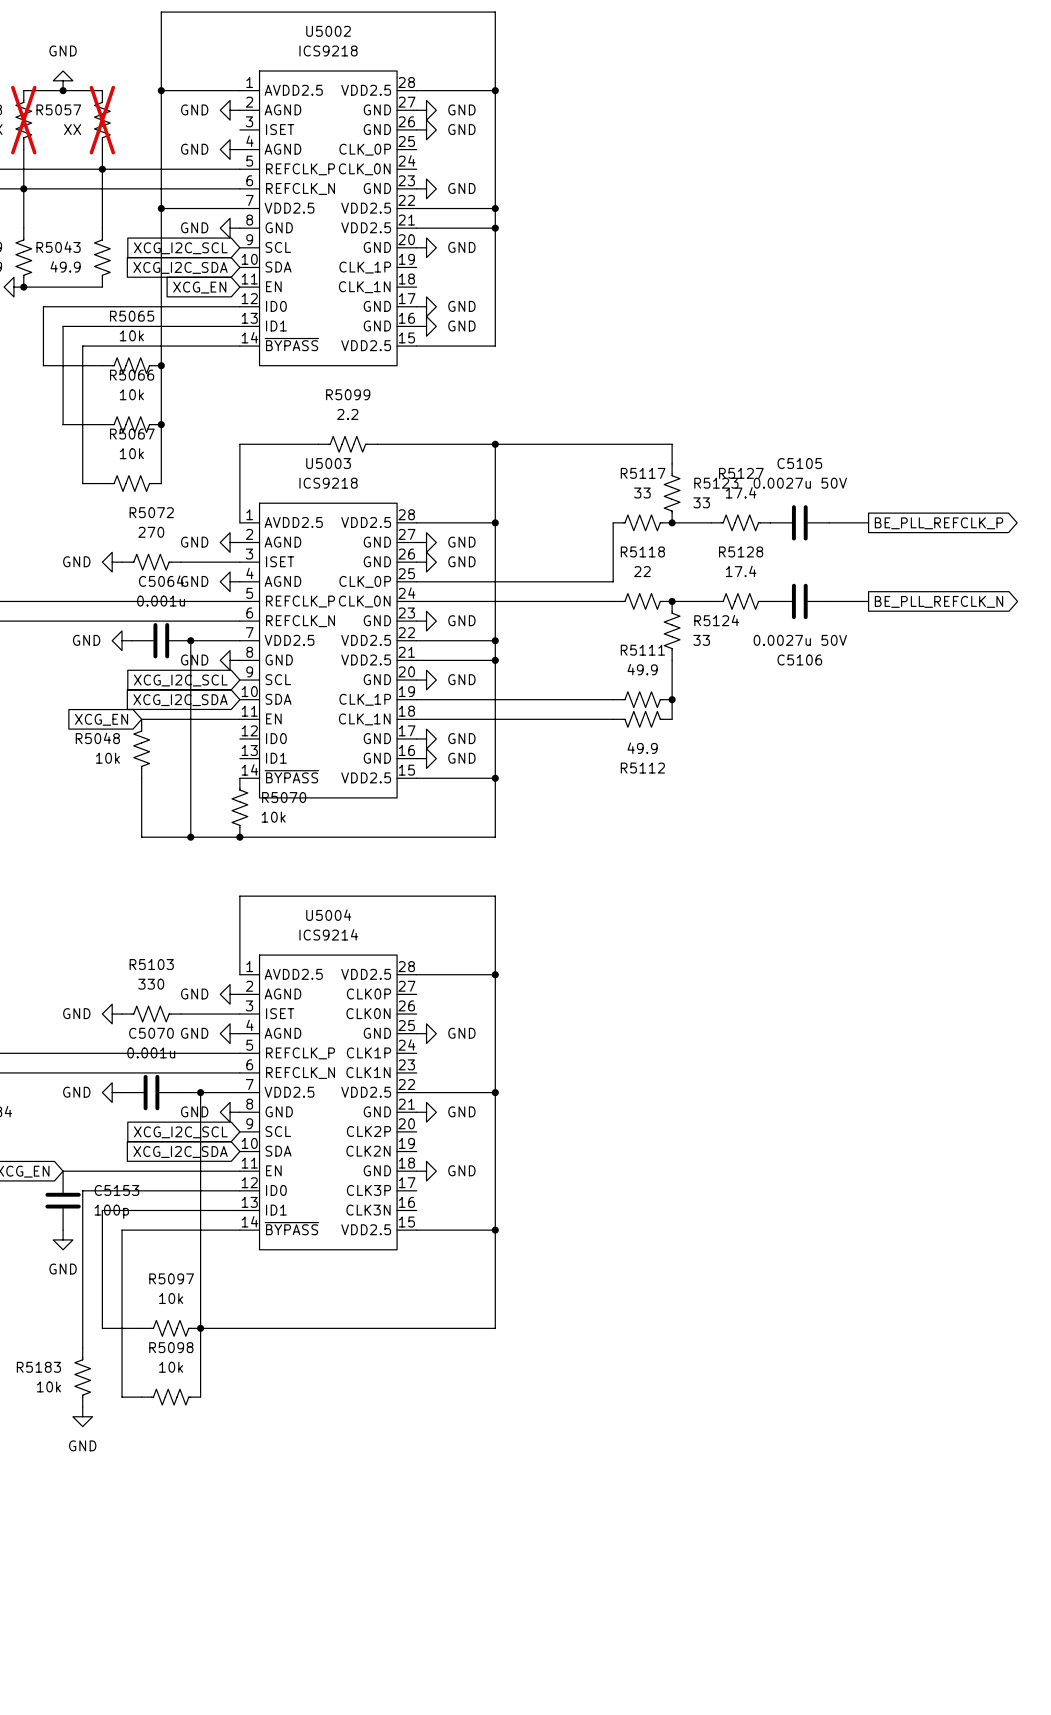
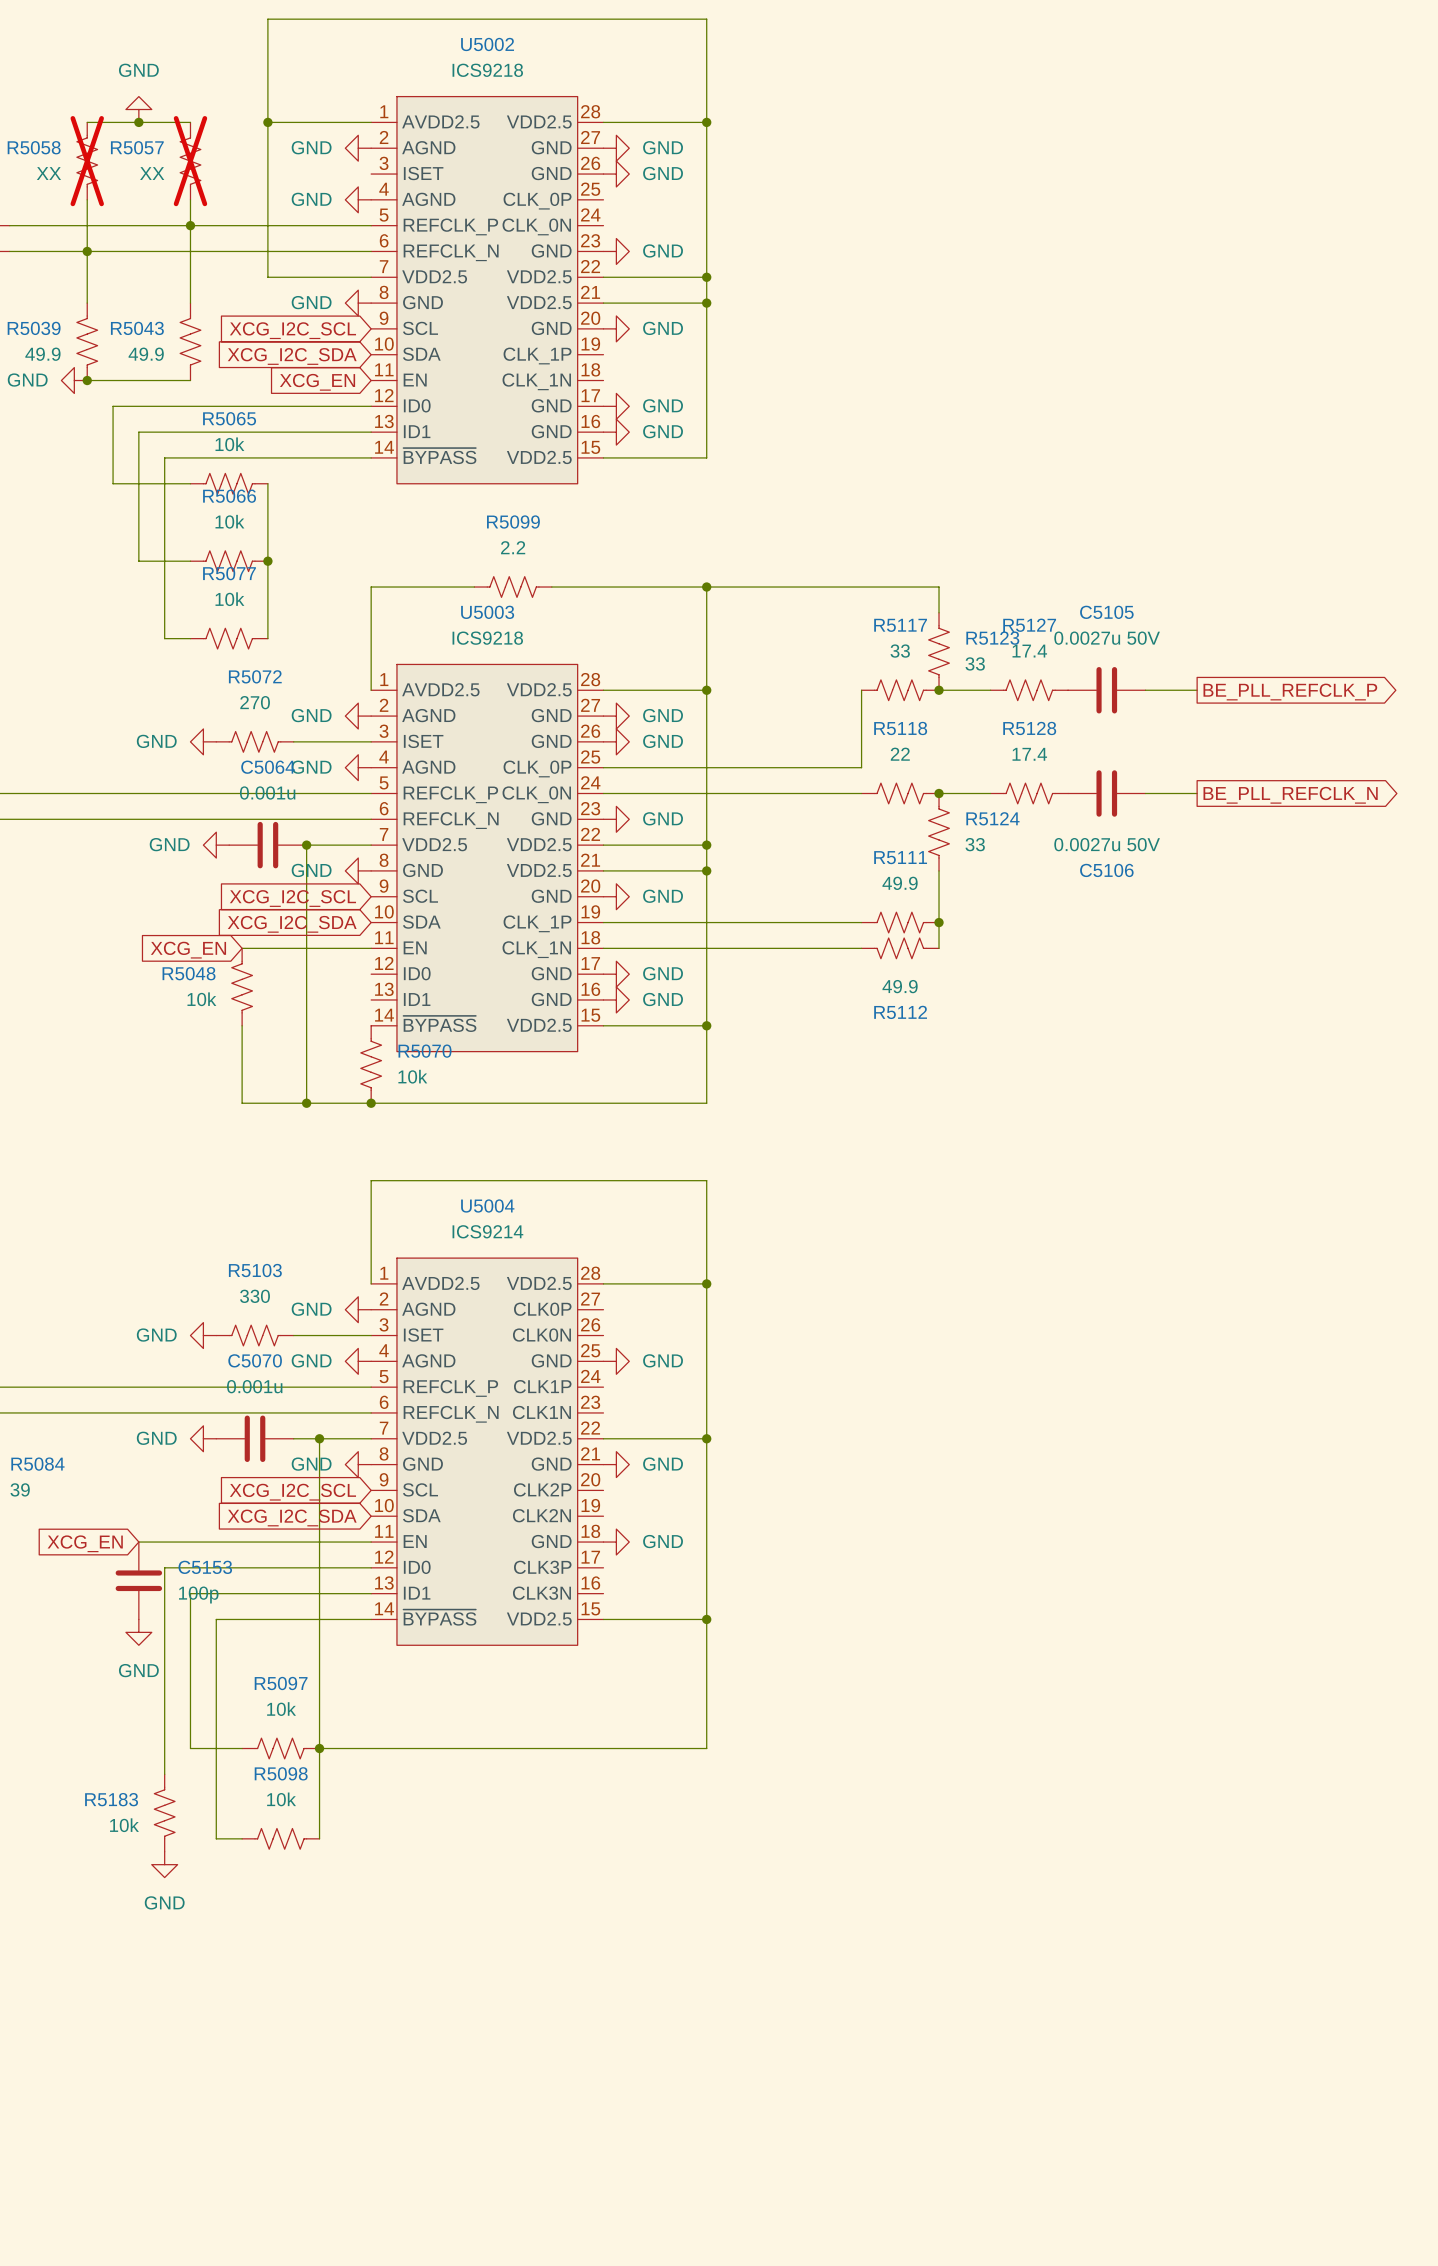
wire: (161, 208) (161, 365) -> none
junction: (161, 208) -> none
junction: (161, 365) -> none
R5067 name: R5067 (132, 434) -> R5077 (229, 573)

